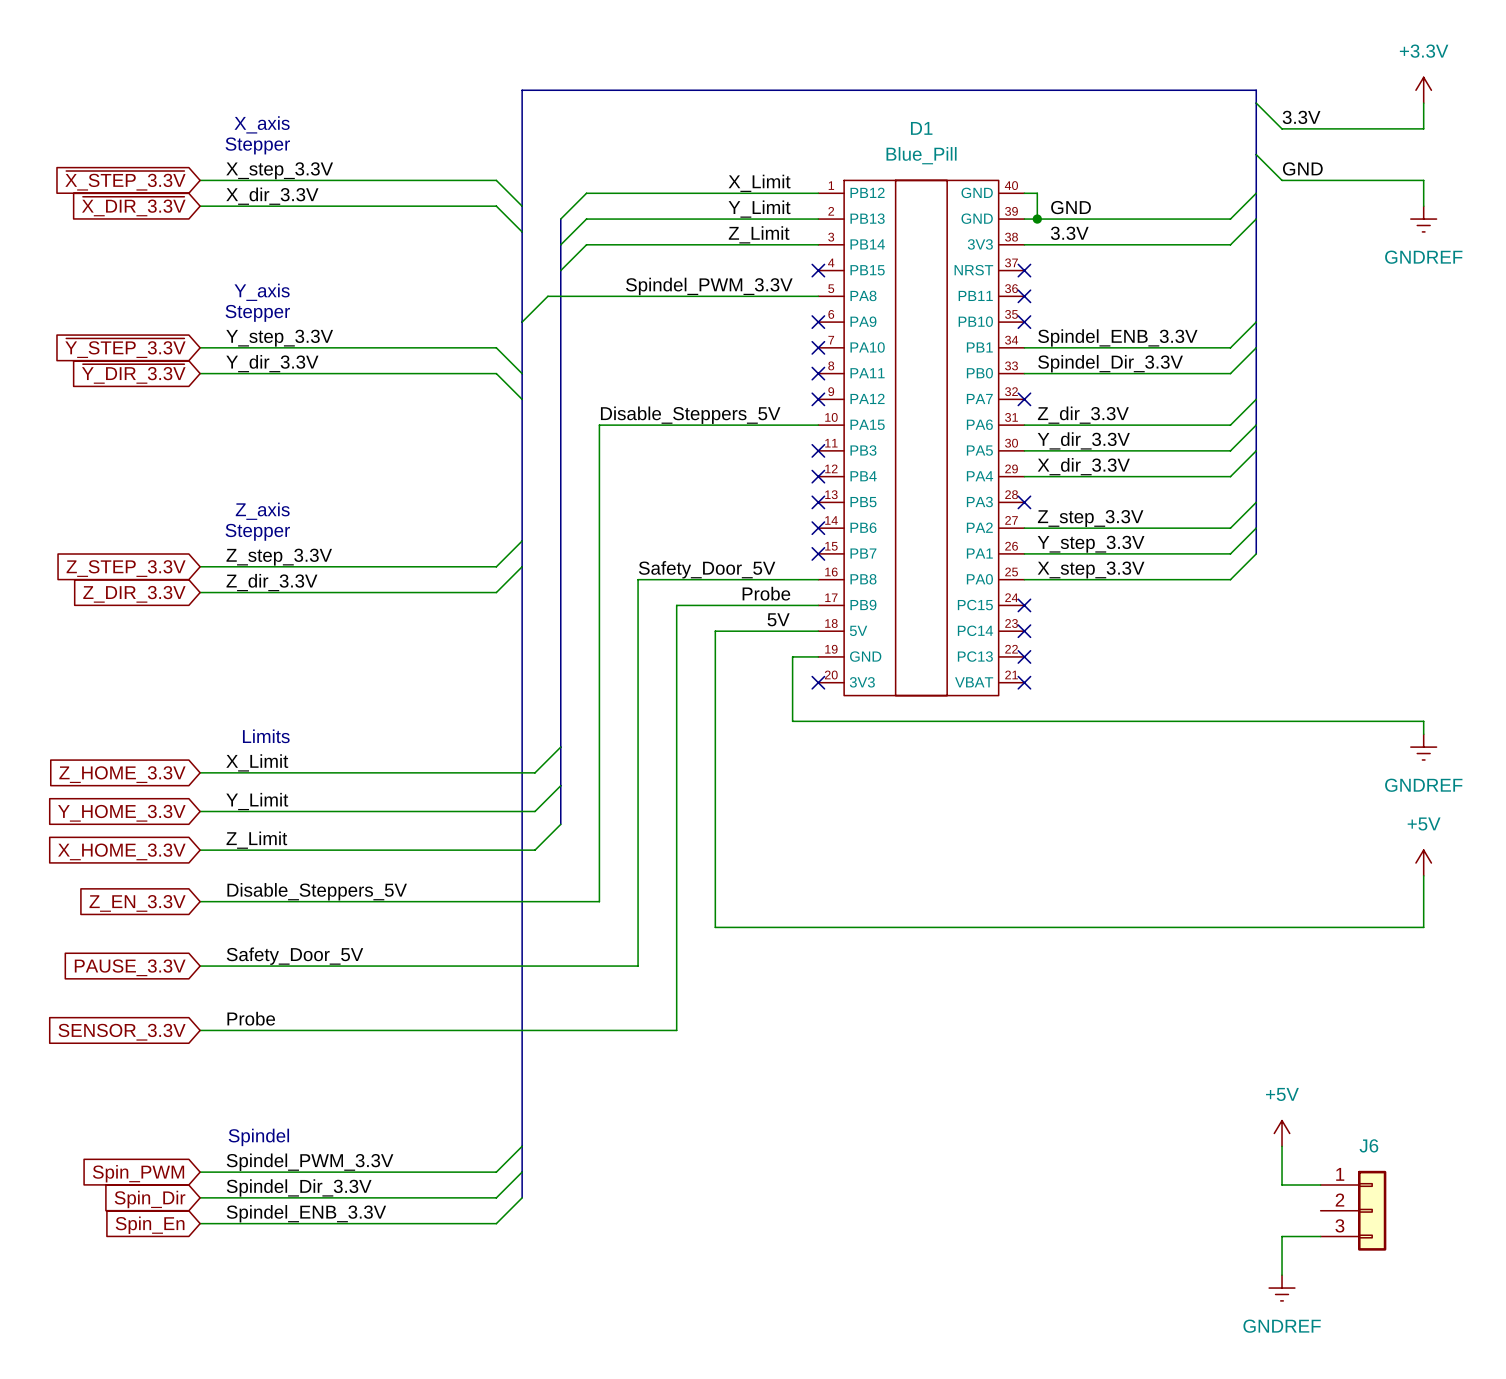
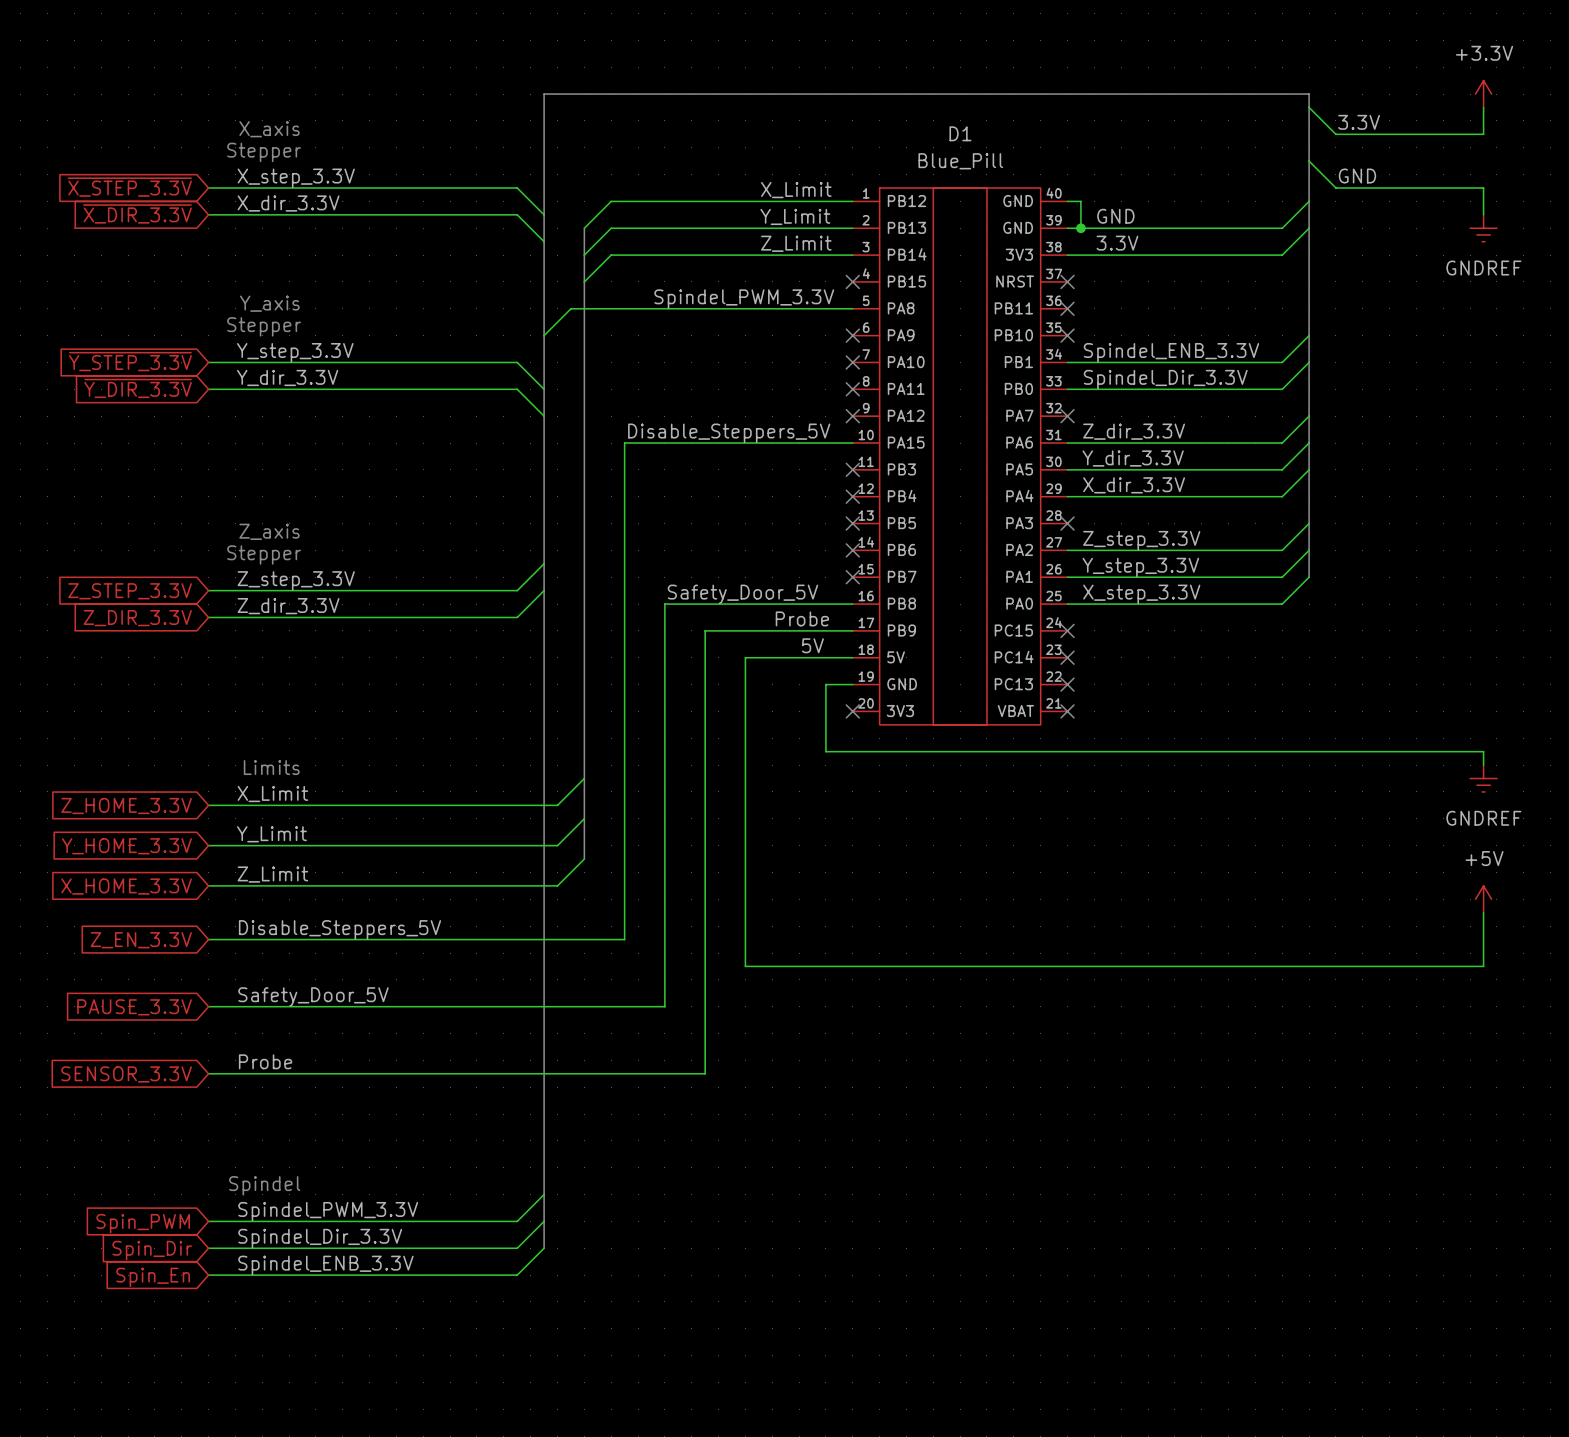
power symbol: +5V (1282, 1133) -> none
wire: (1282, 1146) (1282, 1185) (1320, 1185) -> none
J6: (1353, 1210) -> none
wire: (1320, 1236) (1282, 1236) (1282, 1275) -> none
power symbol: GNDREF (1282, 1288) -> none

